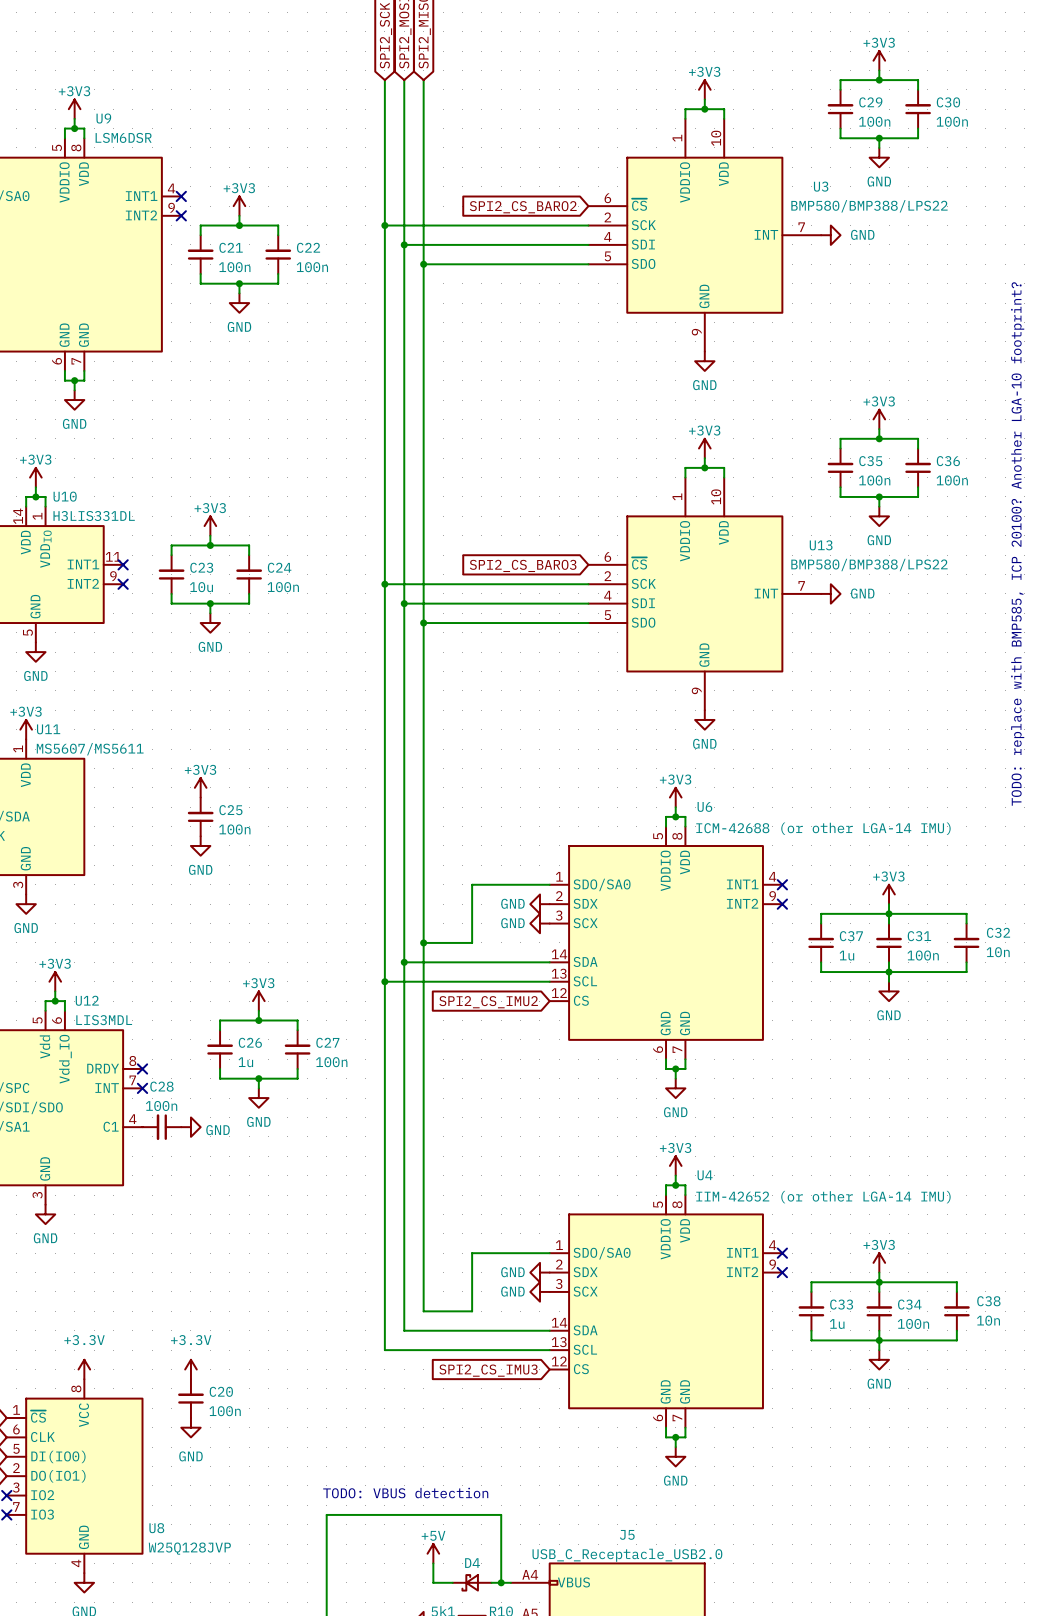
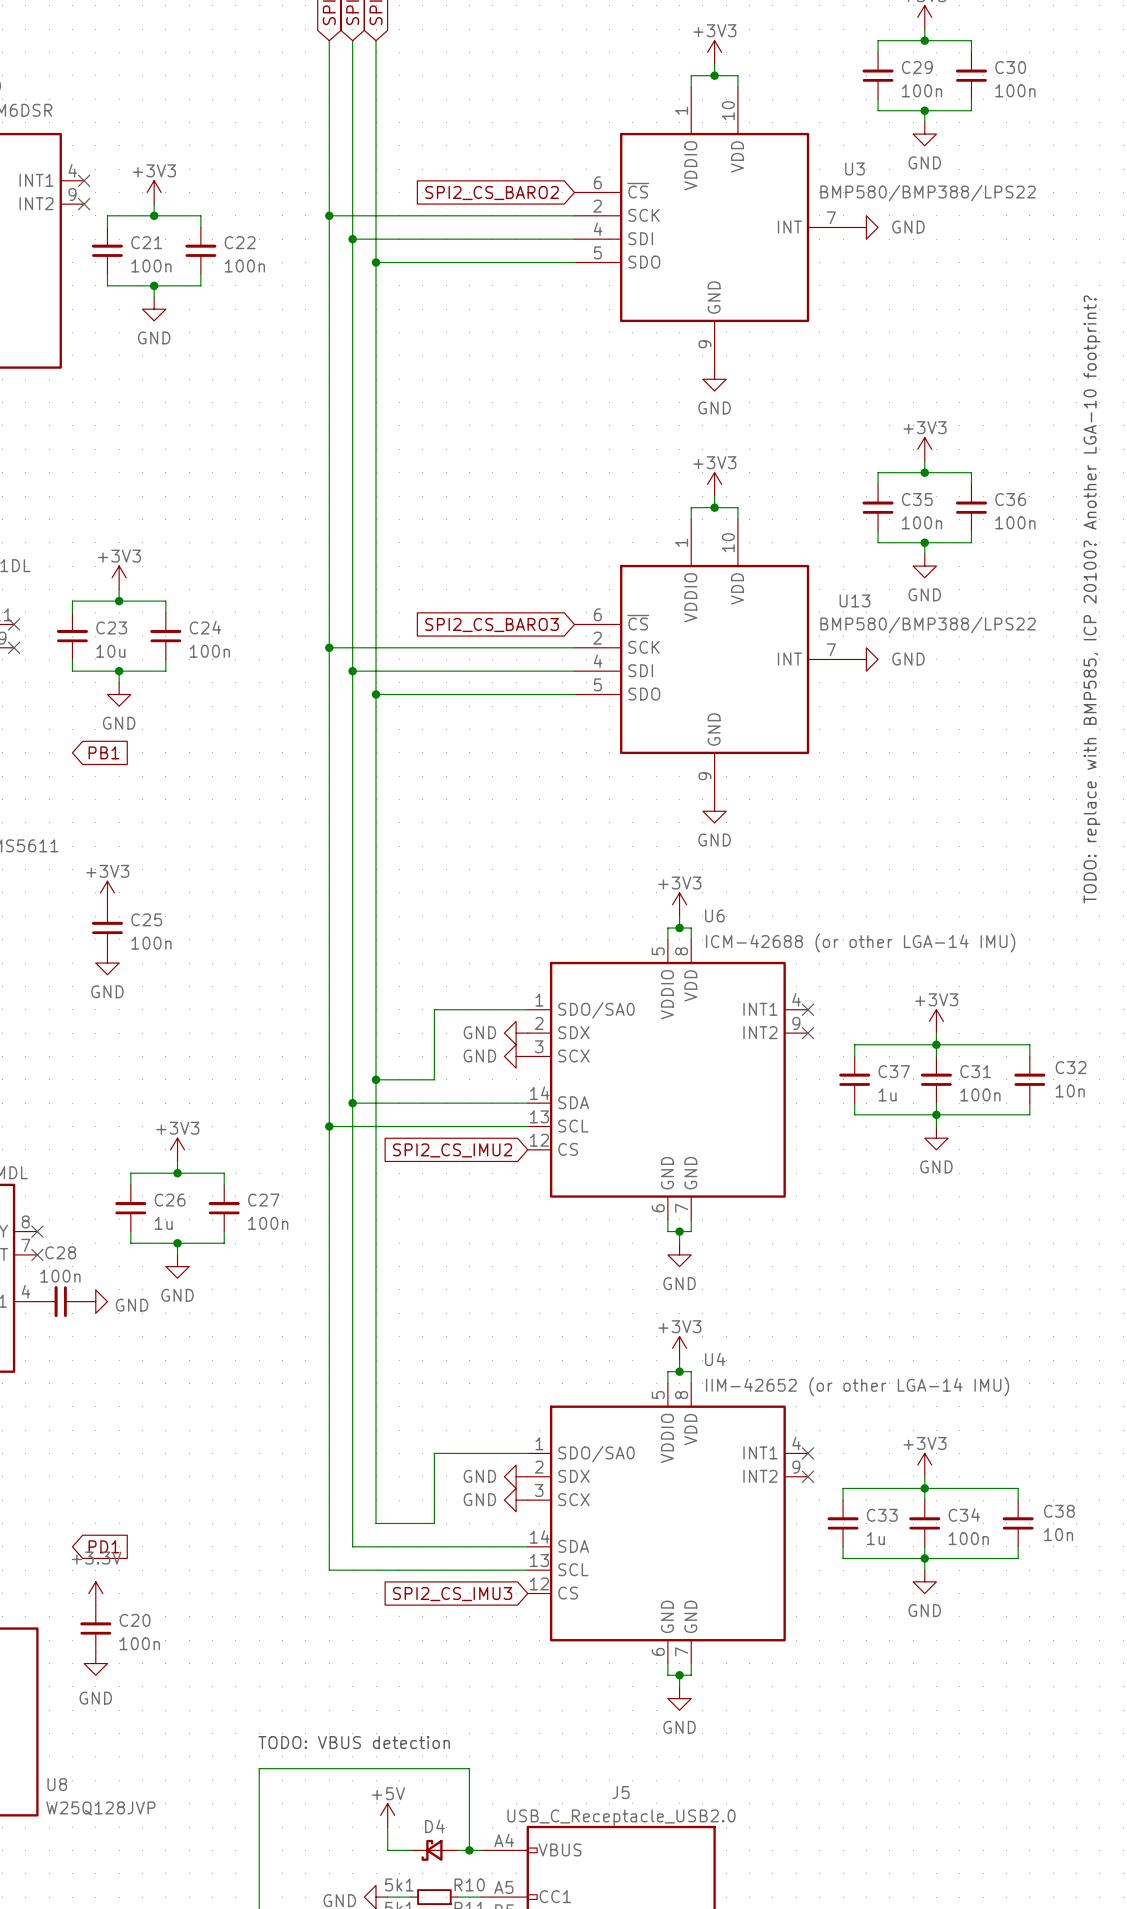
global label: none -> PB1 (104, 752)
global label: none -> PD1 (104, 1546)

